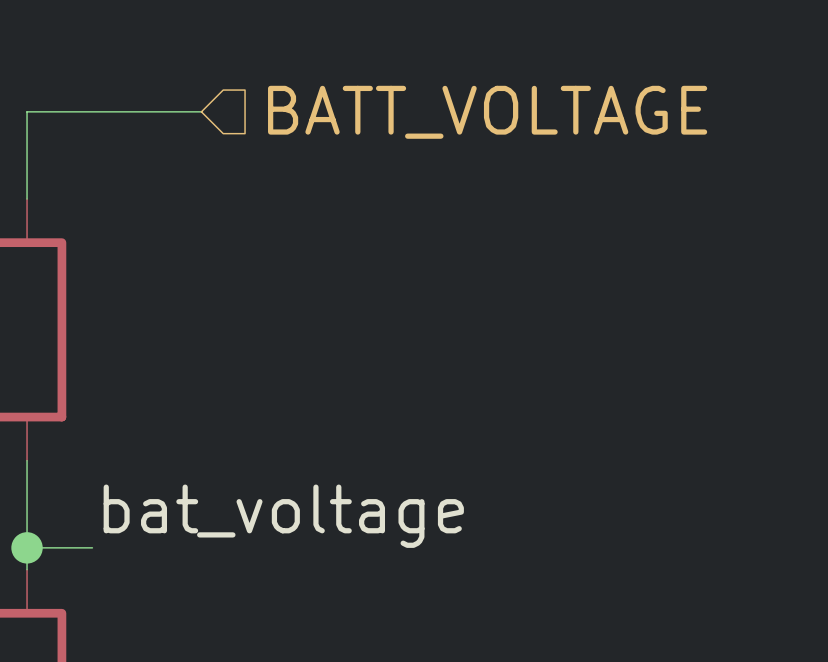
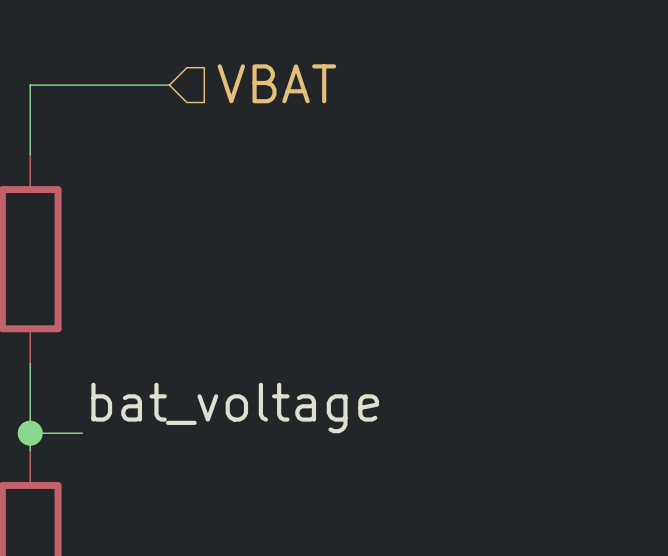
hierarchical label: BATT_VOLTAGE (487, 112) -> VBAT (276, 83)

